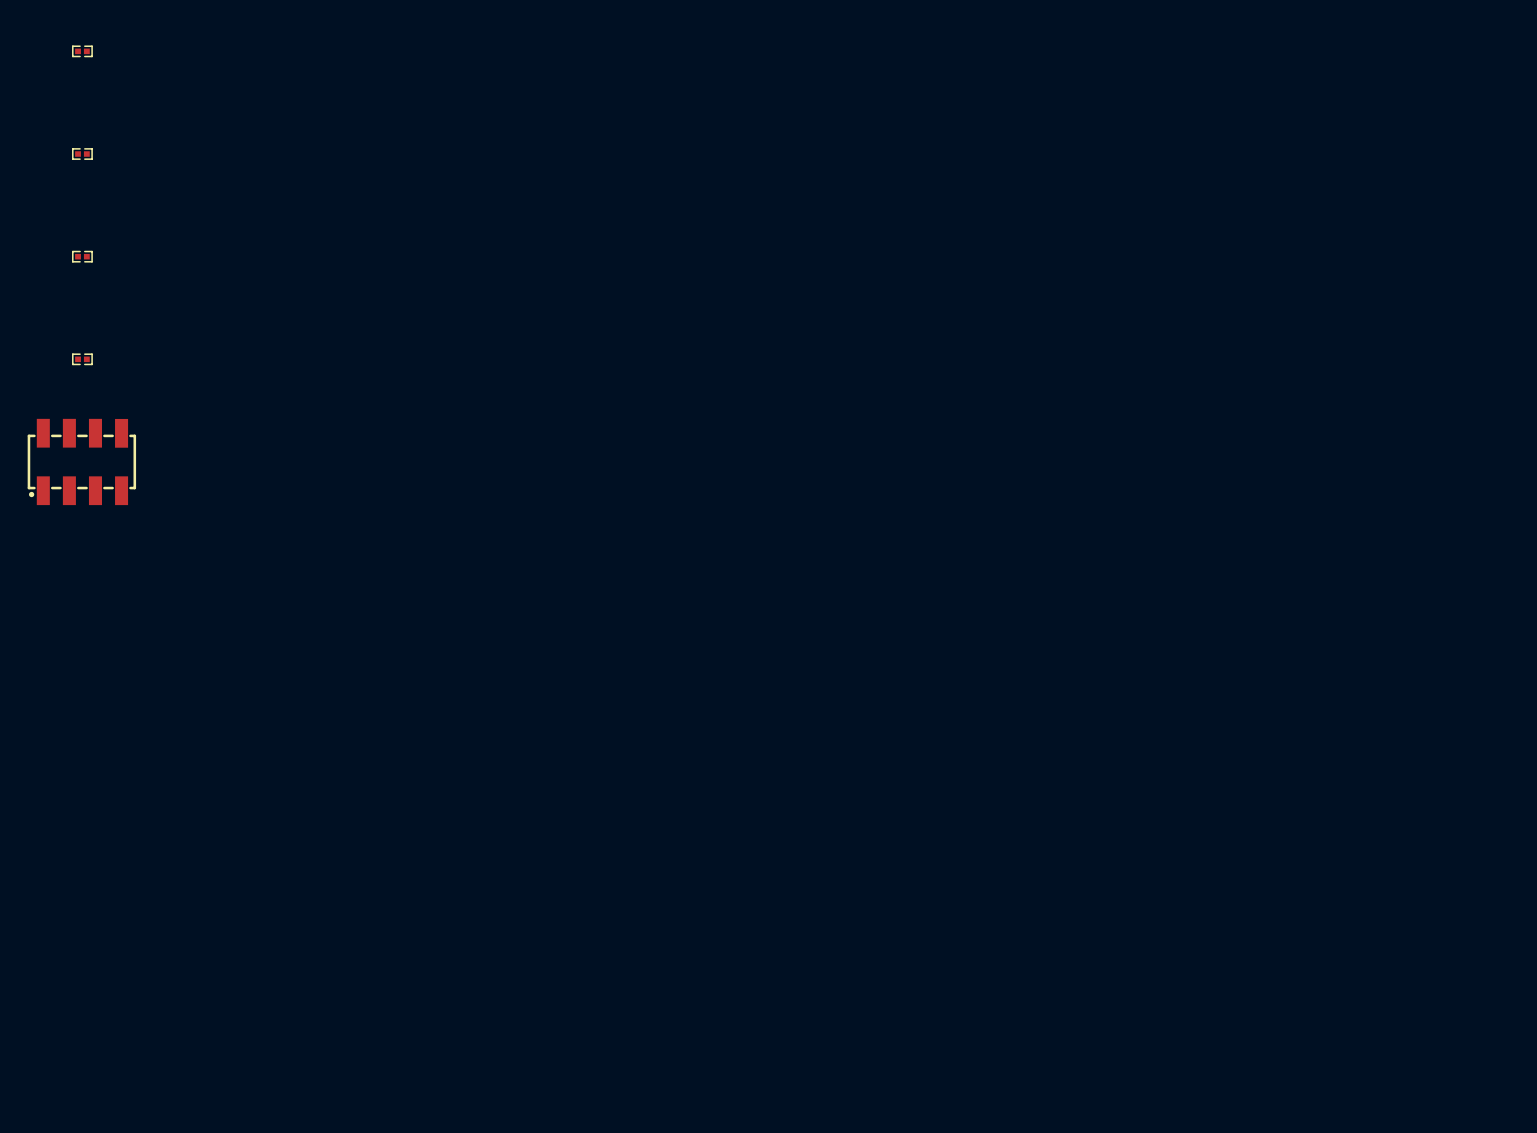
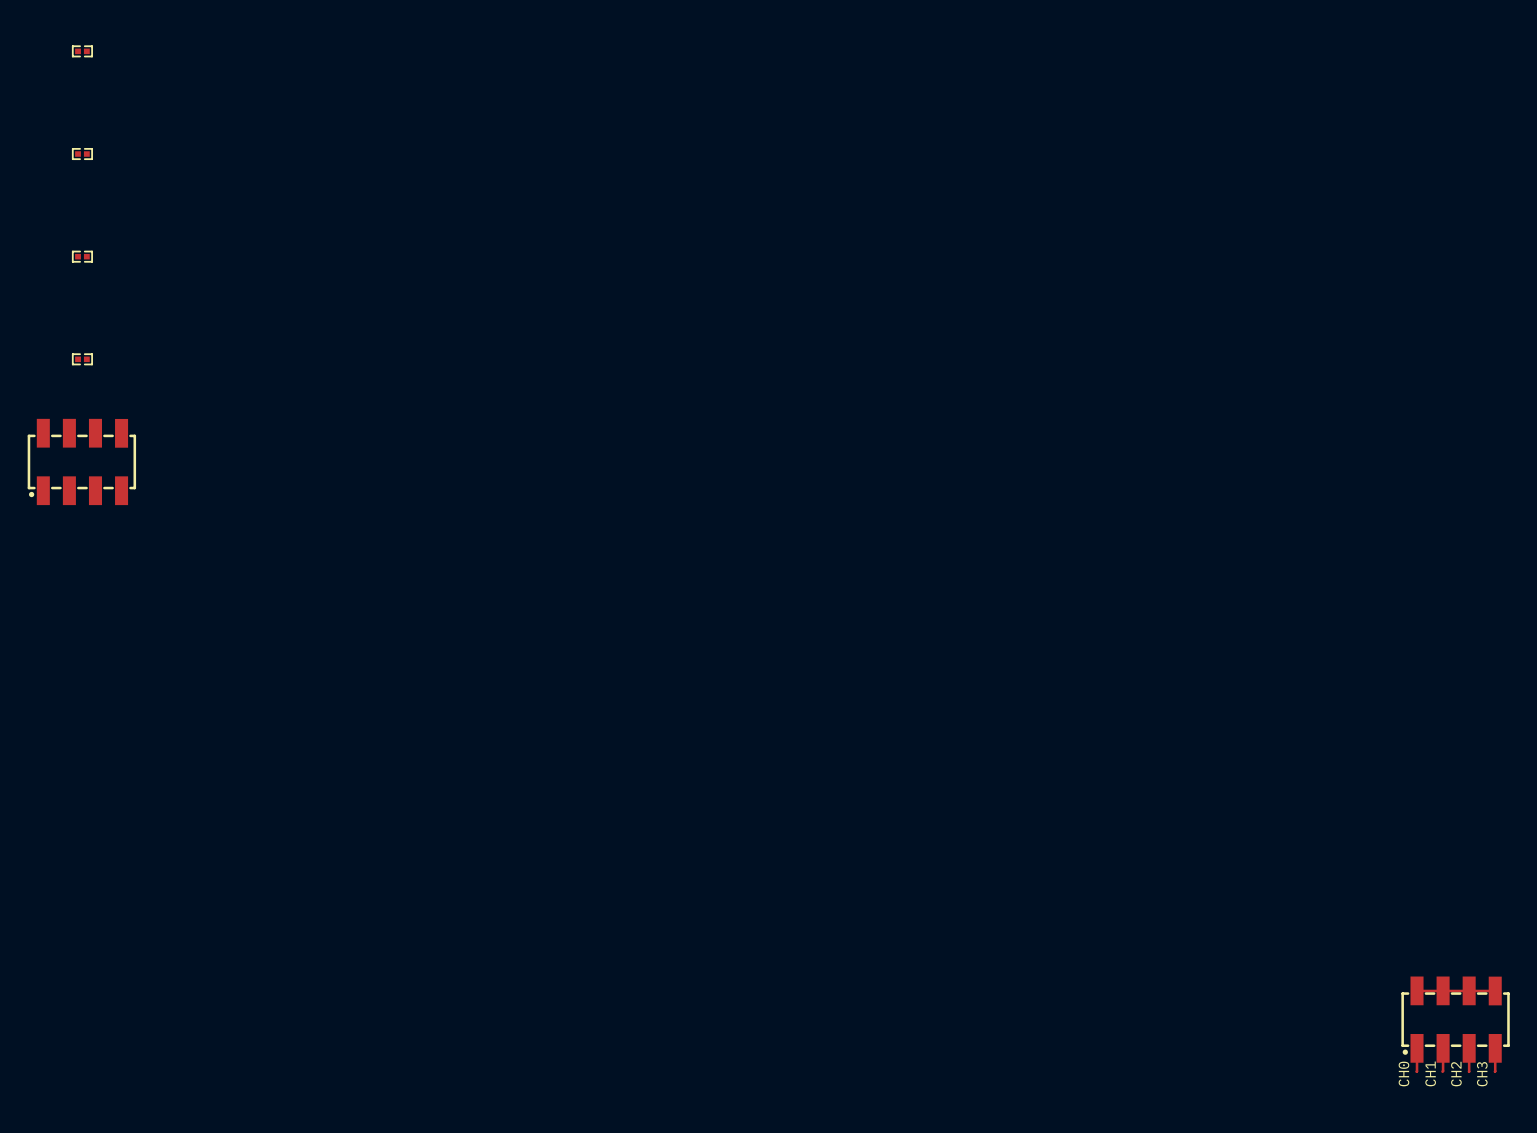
top track: none -> (1417, 990) (1495, 990)
part: none -> (1455, 1019)
top track: none -> (1417, 1048) (1416, 1071)
top track: none -> (1443, 1048) (1442, 1071)
top track: none -> (1469, 1048) (1468, 1071)
top track: none -> (1495, 1048) (1494, 1071)
text: none -> CH0 (1403, 1073)
text: none -> CH1 (1430, 1073)
text: none -> CH2 (1456, 1074)
text: none -> CH3 (1482, 1074)

